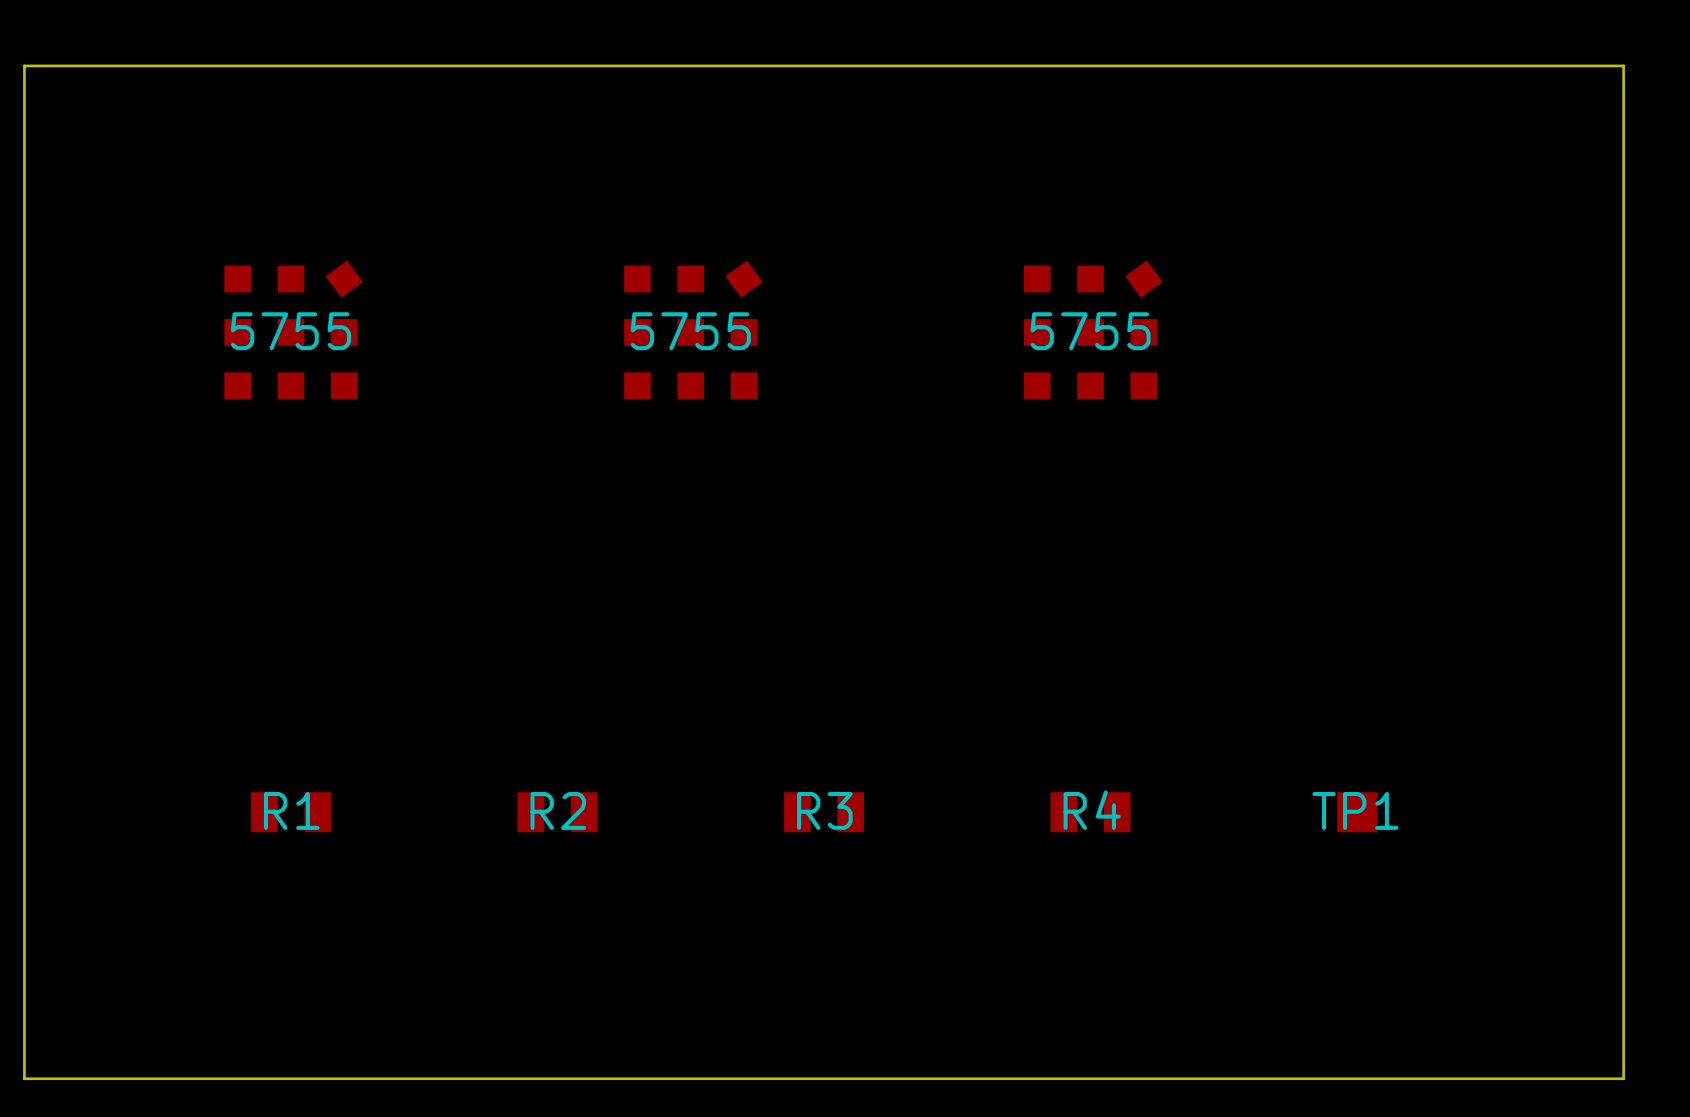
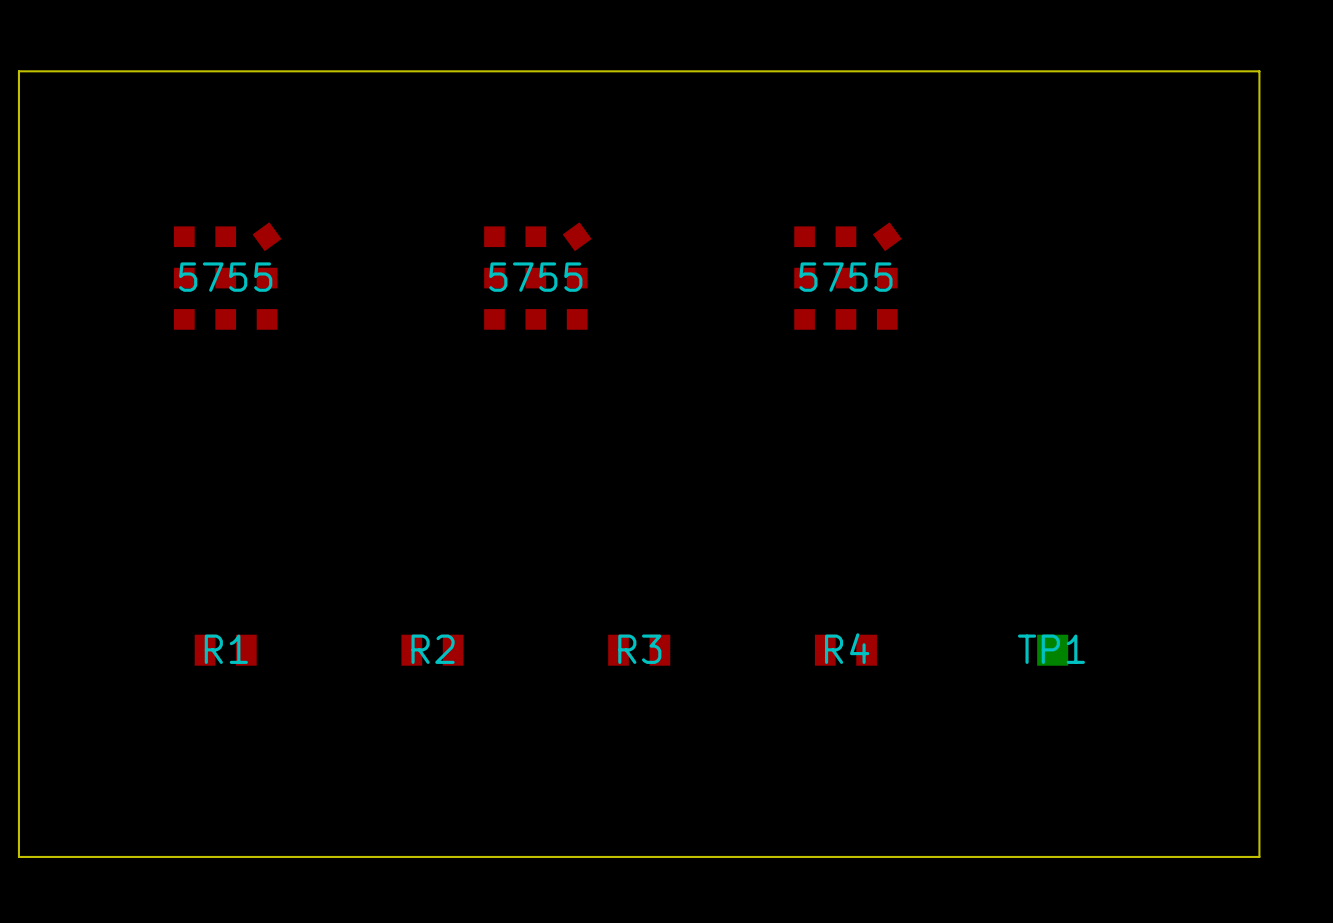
TP1 footprint: [1337, 792, 1378, 833] -> [1037, 634, 1069, 666]

